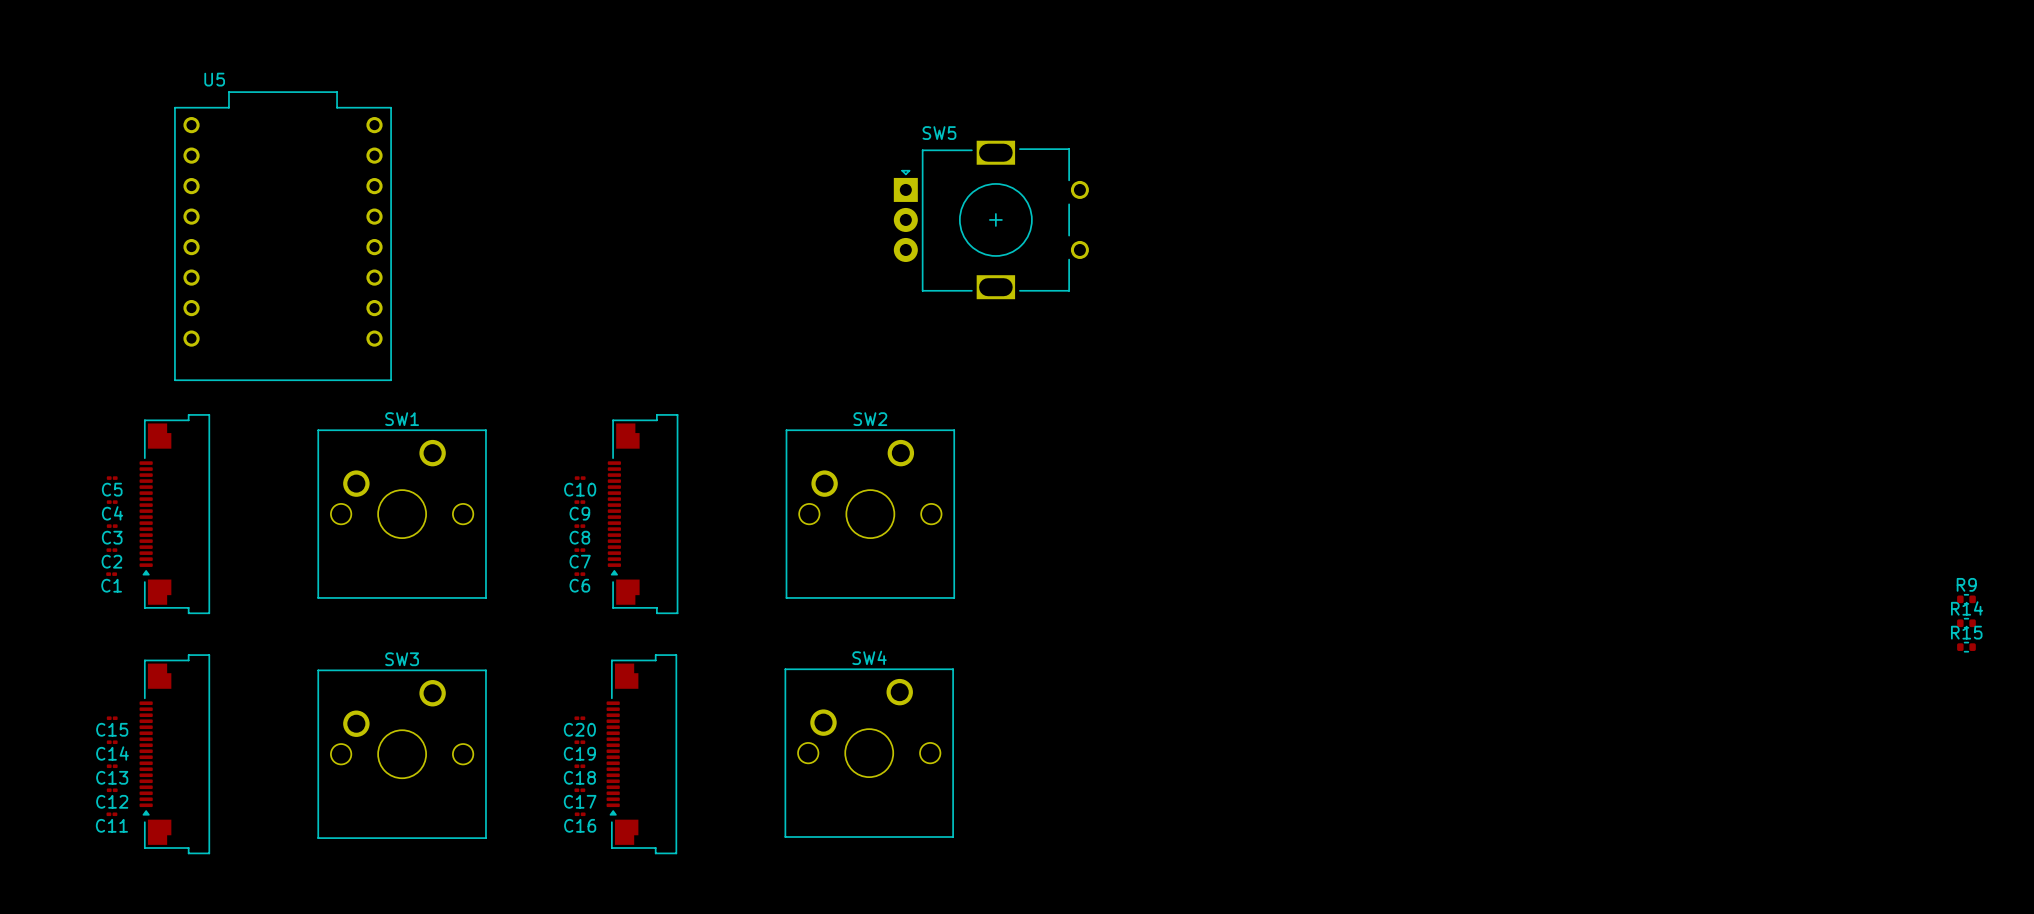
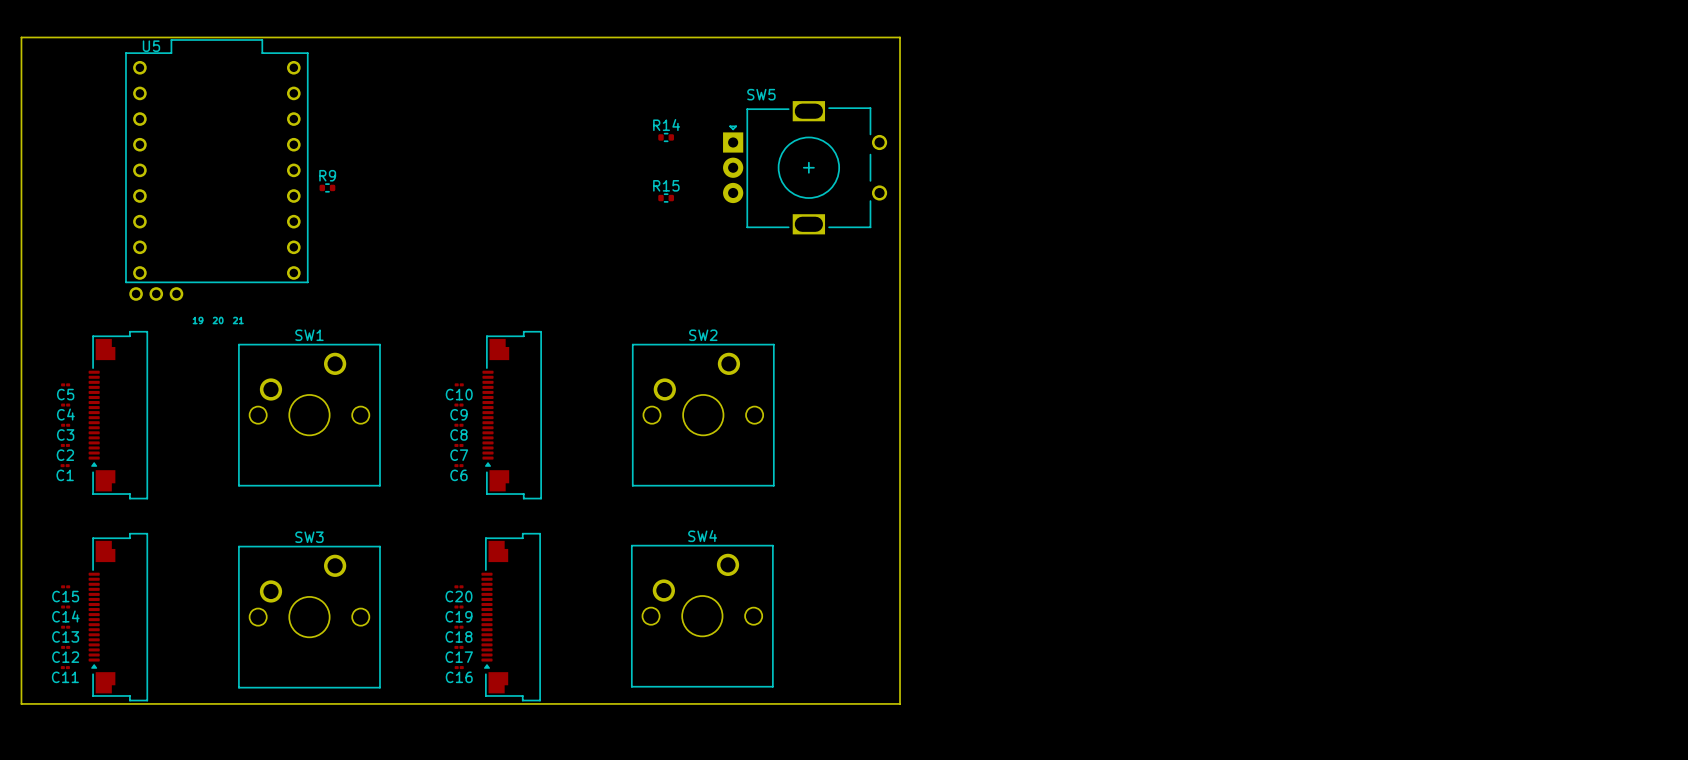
board edge: none -> (21, 37) (900, 37) (900, 703) (21, 703) (21, 37)
U5 footprint: [174, 91, 392, 382] -> [125, 39, 309, 301]
R9 position: (1966, 599) -> (327, 187)
R14 position: (1966, 623) -> (666, 137)
R15 position: (1966, 647) -> (666, 198)

